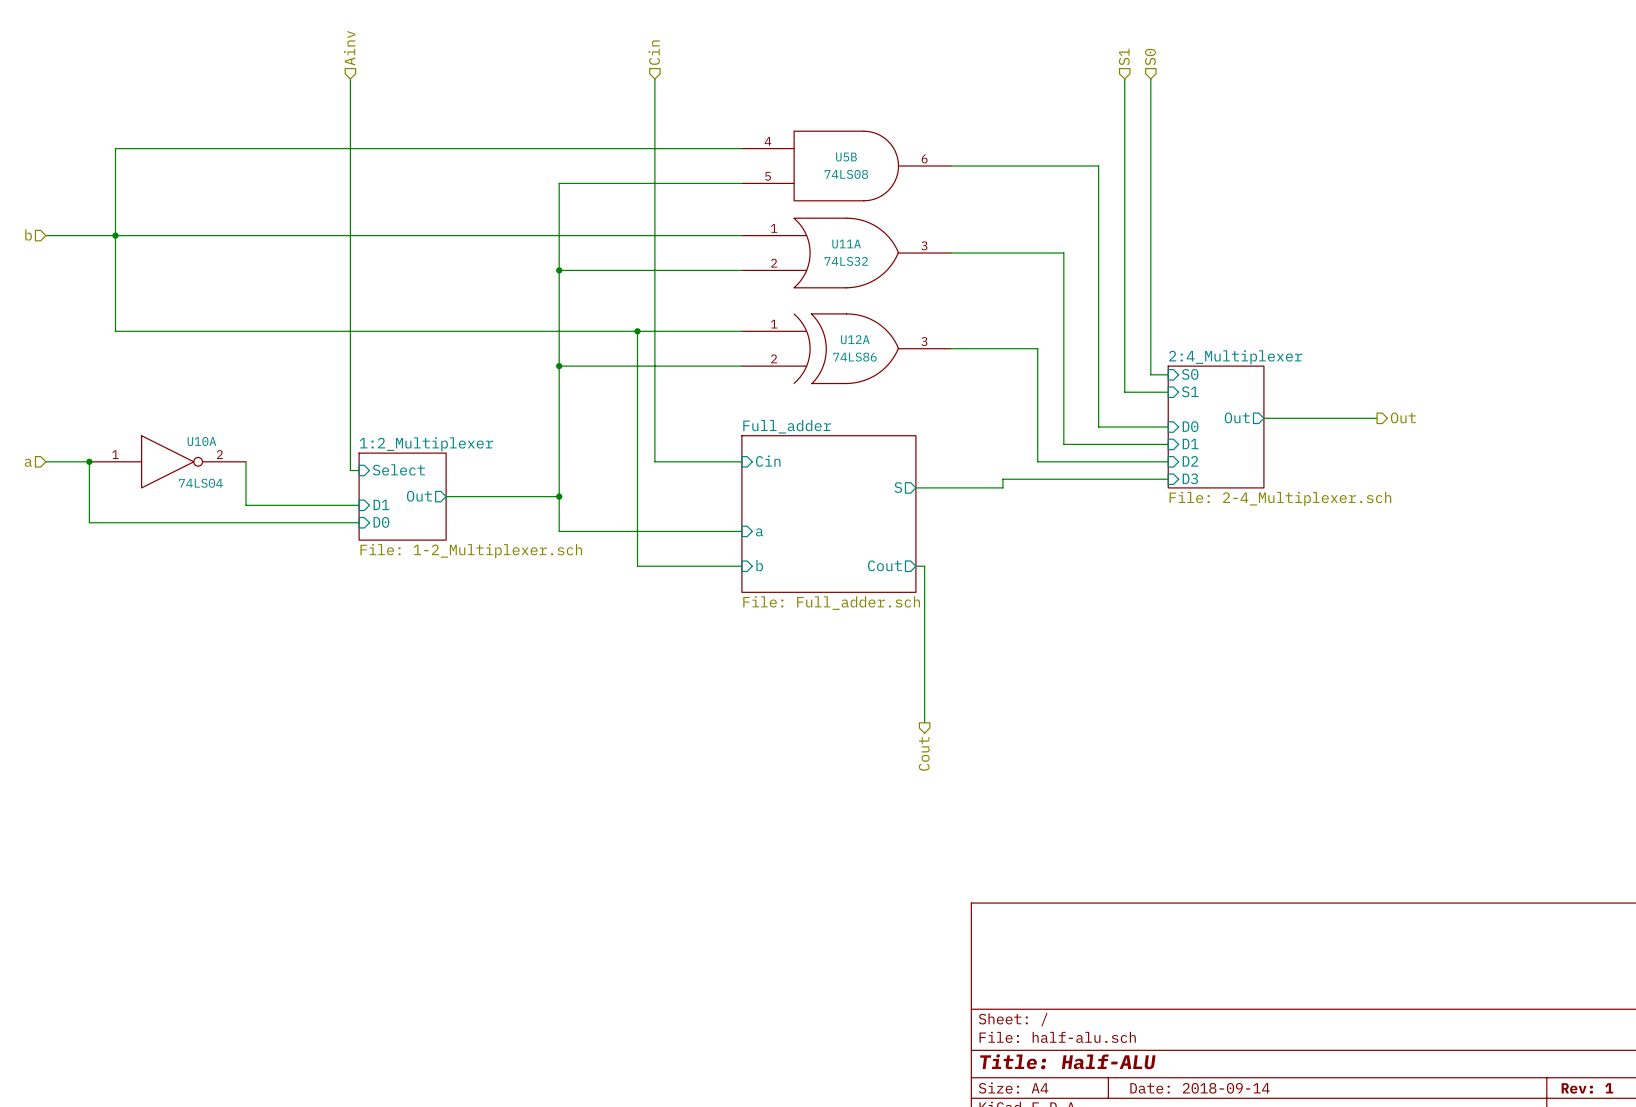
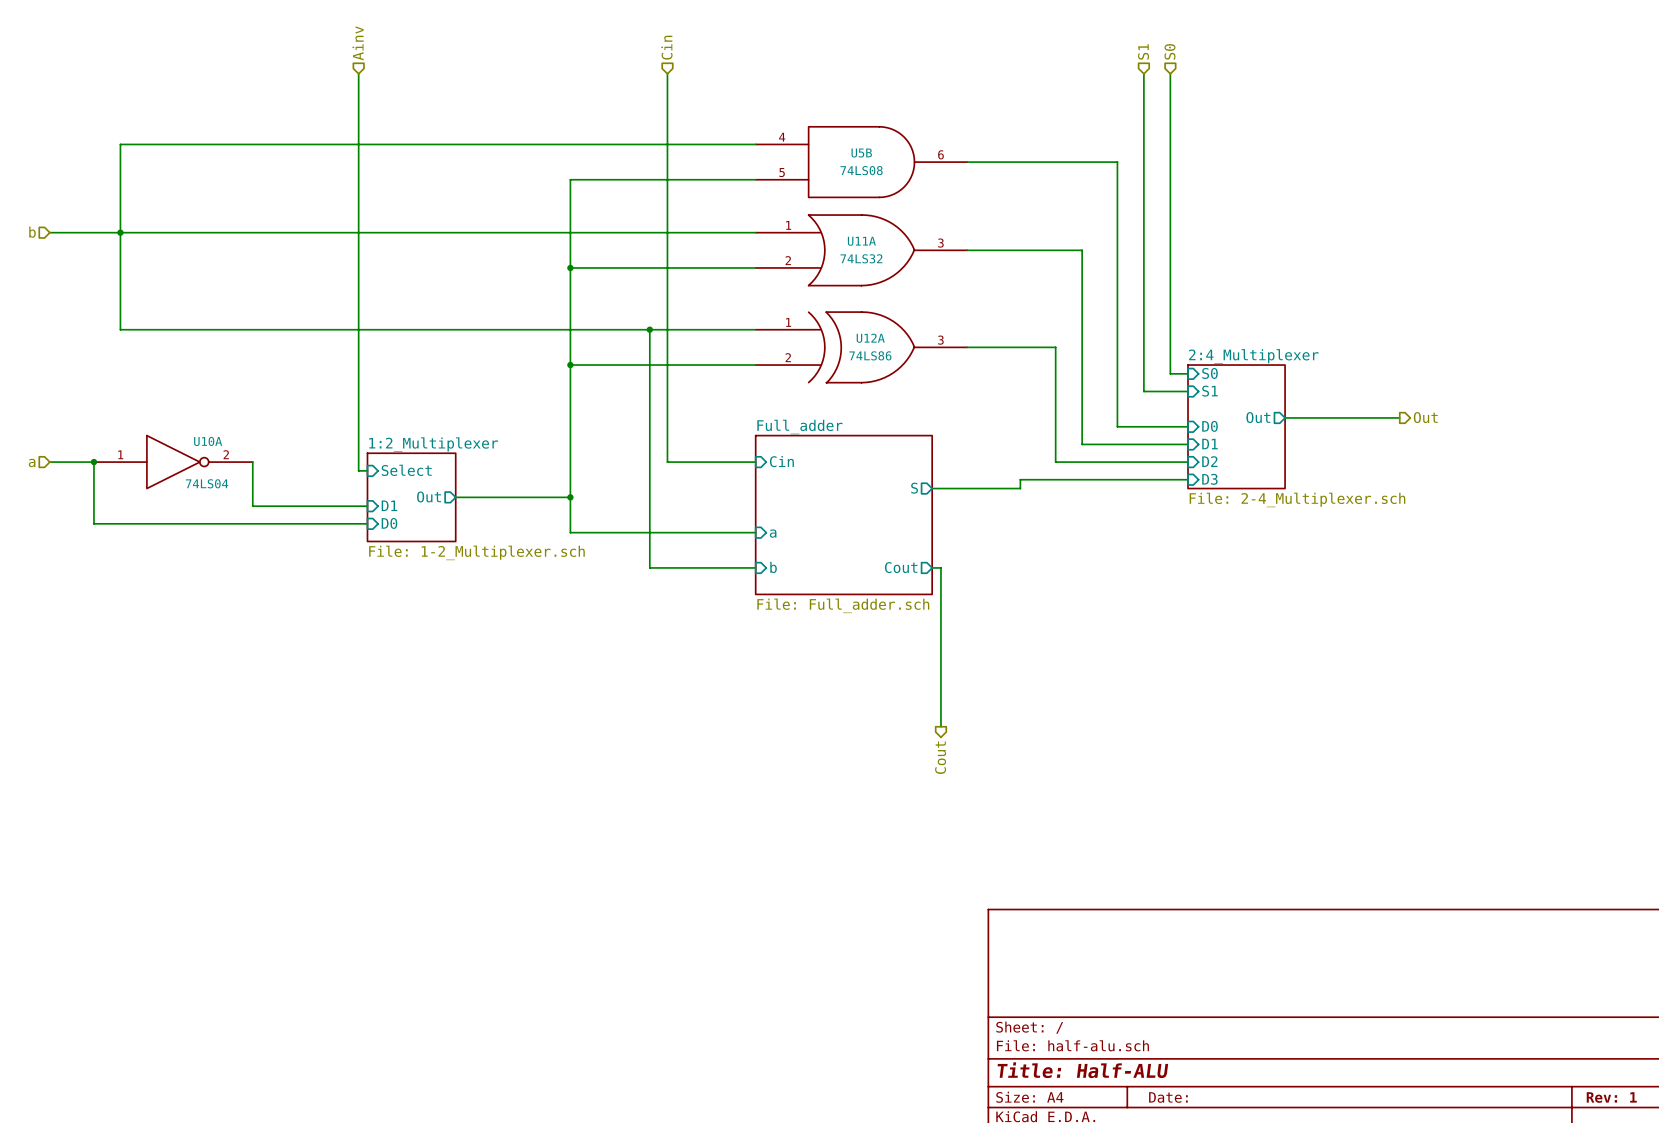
title block: Date: 2018-09-14 (1200, 1088) -> Date: (1168, 1097)

